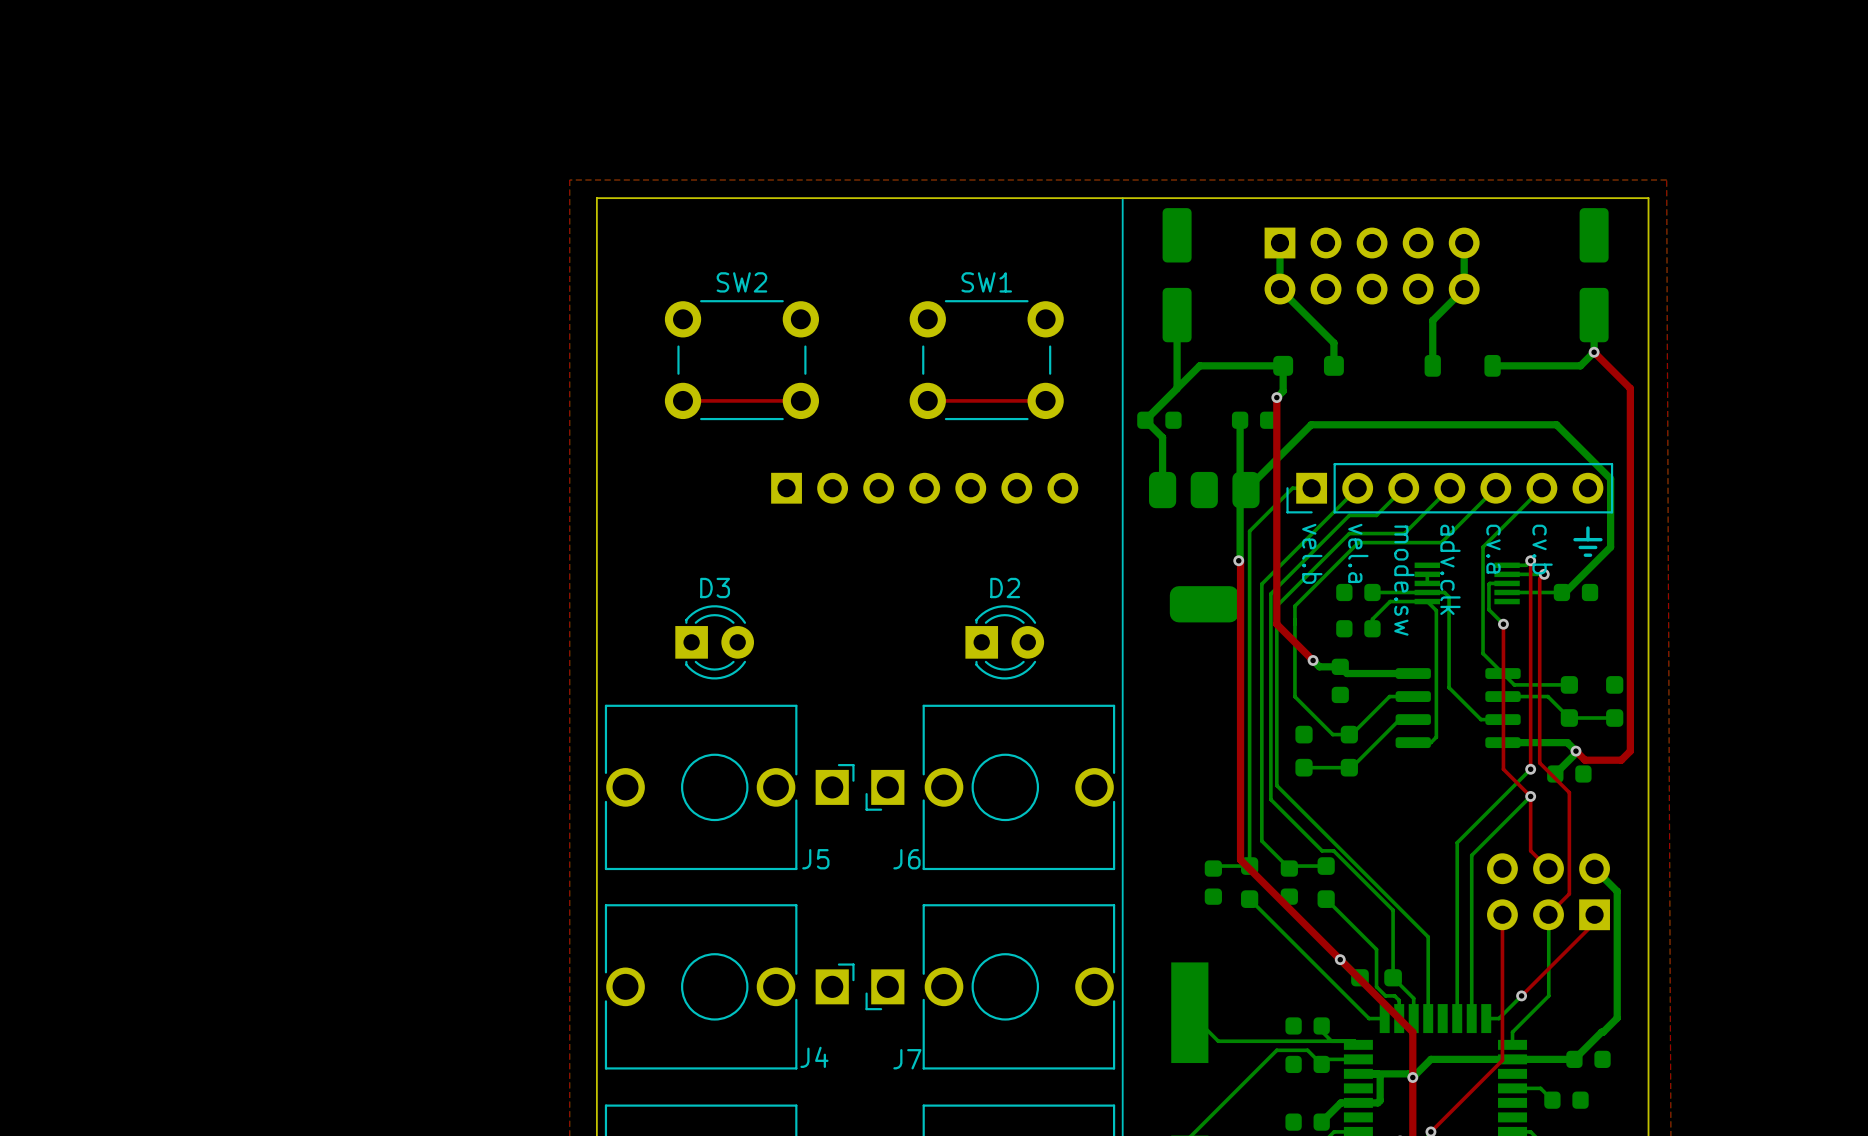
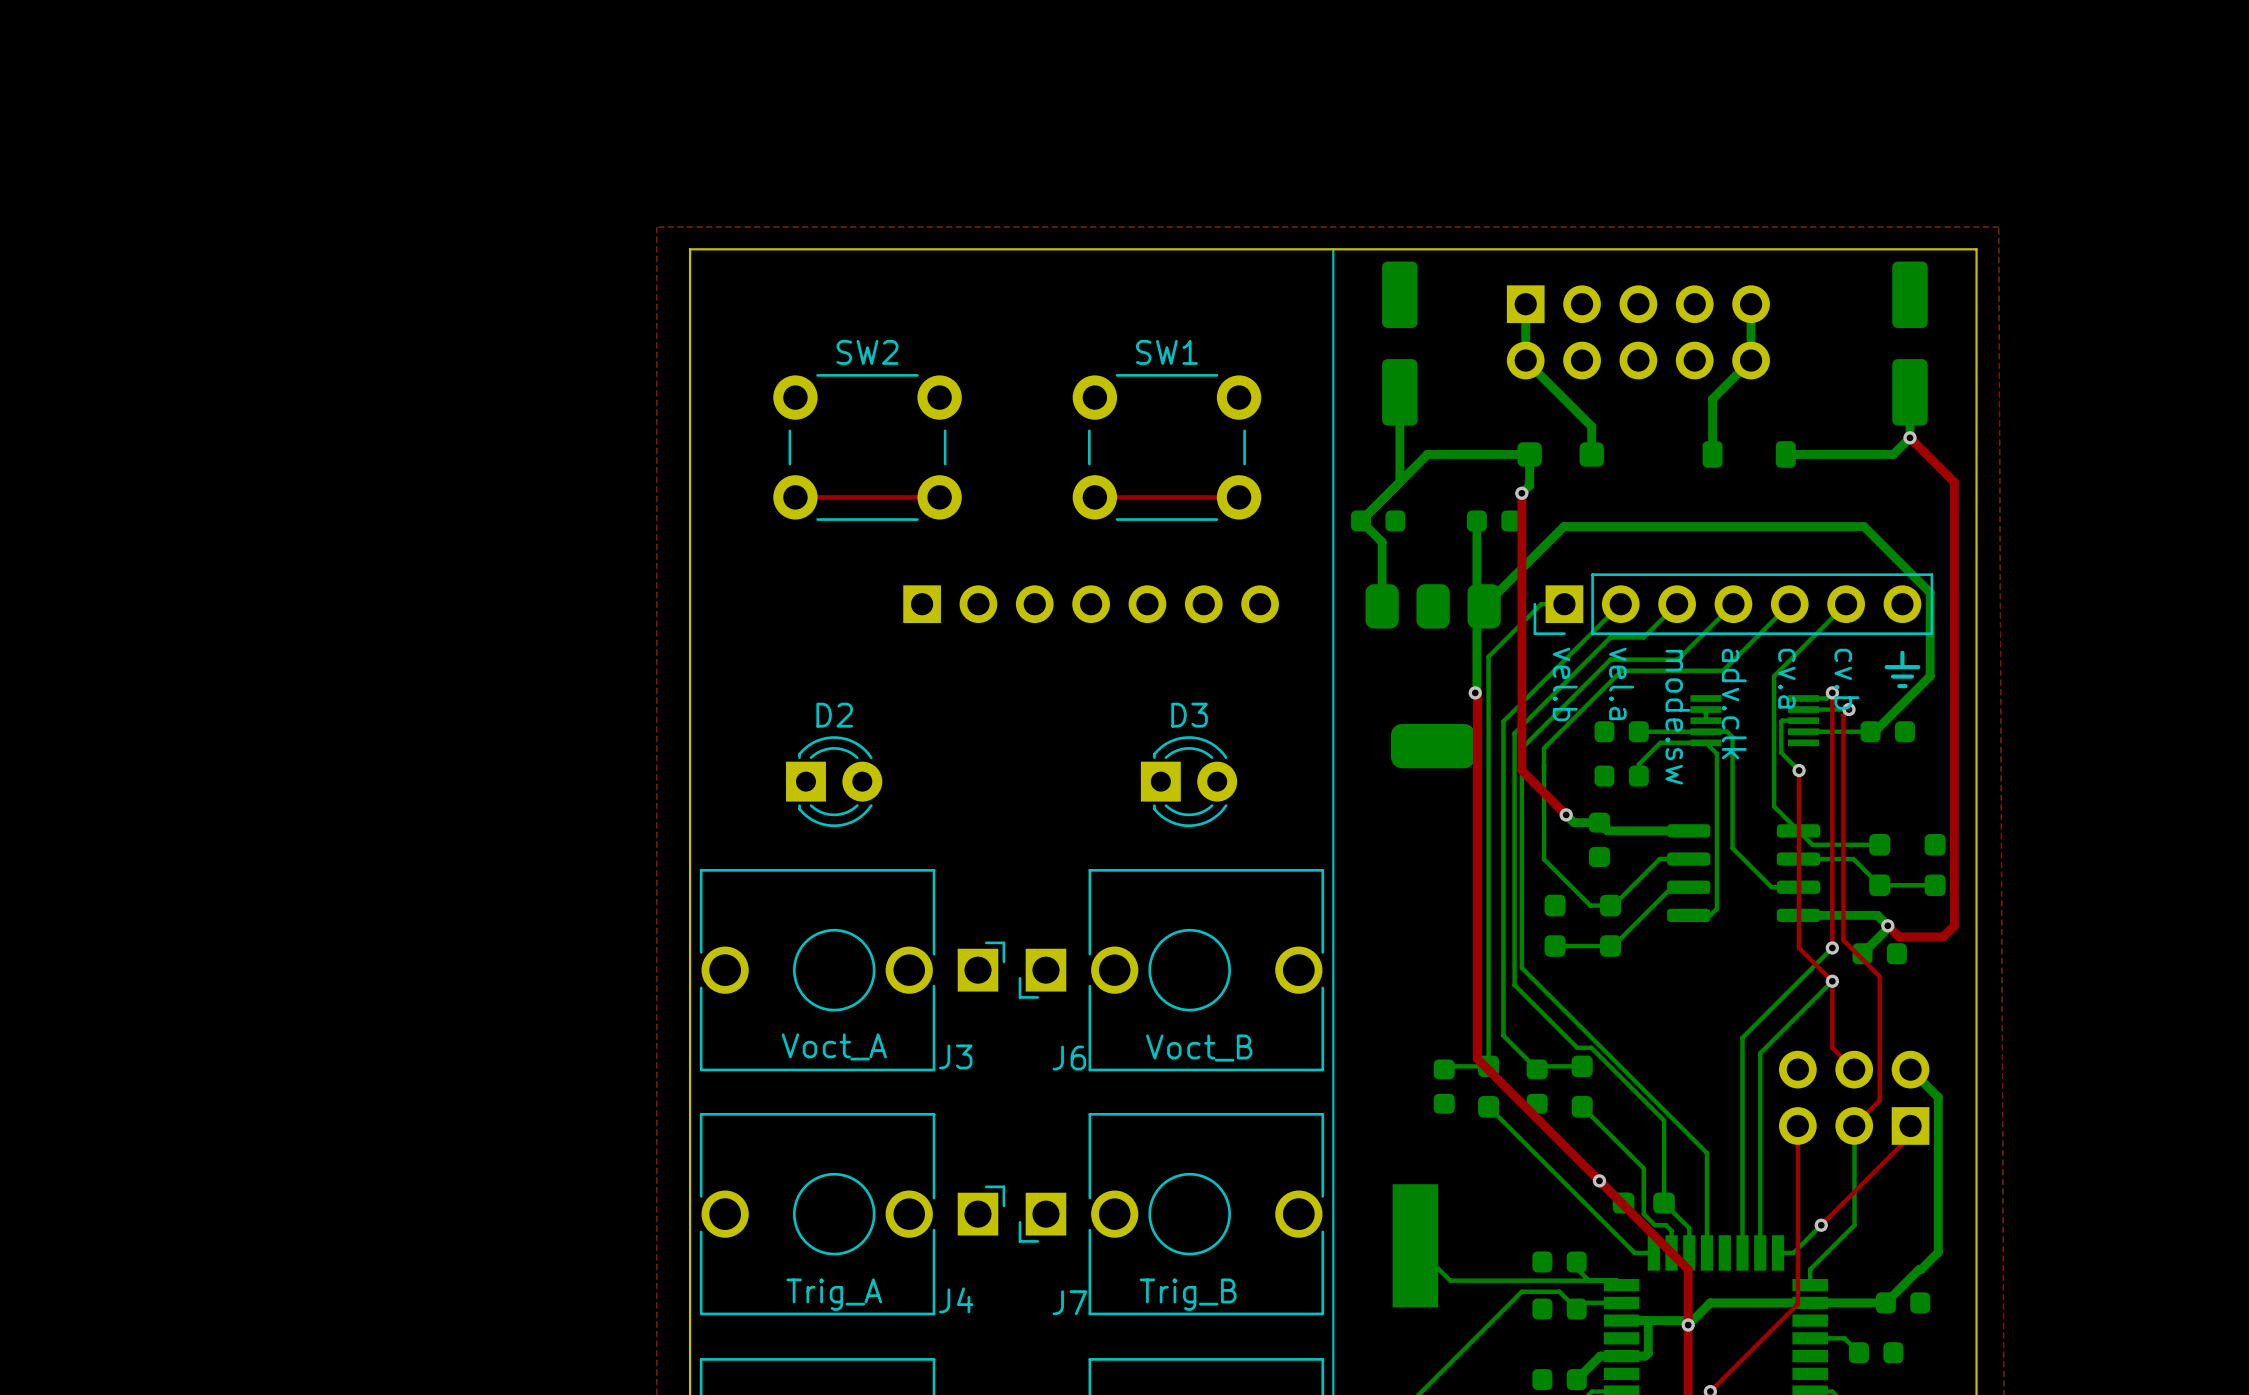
D3 position: (714, 642) -> (1189, 781)
D2 position: (1004, 642) -> (834, 781)
J5 value: none -> Voct_A (834, 1046)
J6 value: none -> Voct_B (1199, 1048)
J5 name: J5 (815, 859) -> J3 (955, 1056)
J4 value: none -> Trig_A (834, 1294)
J7 value: none -> Trig_B (1188, 1294)

